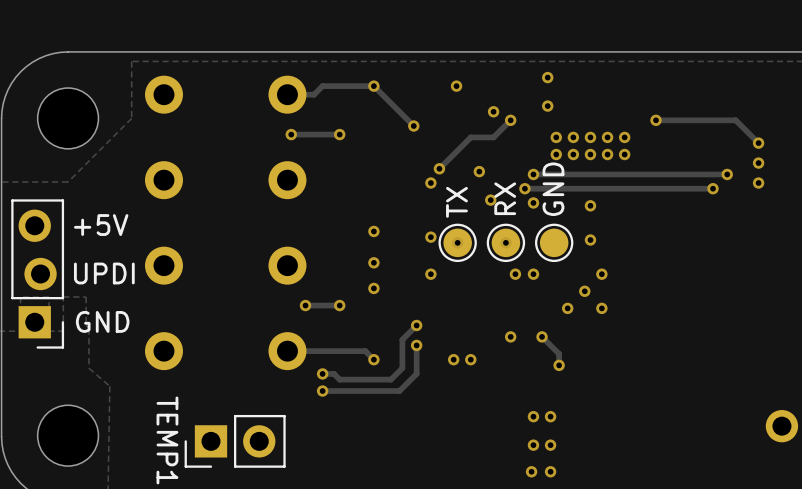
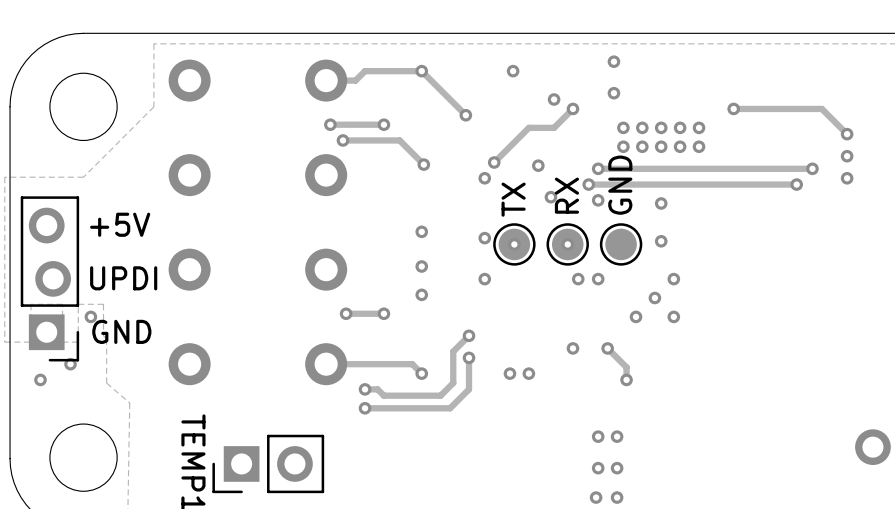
track: none -> (342, 140) (399, 140) (423, 164)
via: none -> (342, 140)
via: none -> (423, 164)
via: none -> (90, 316)
via: none -> (70, 364)
via: none -> (40, 379)

